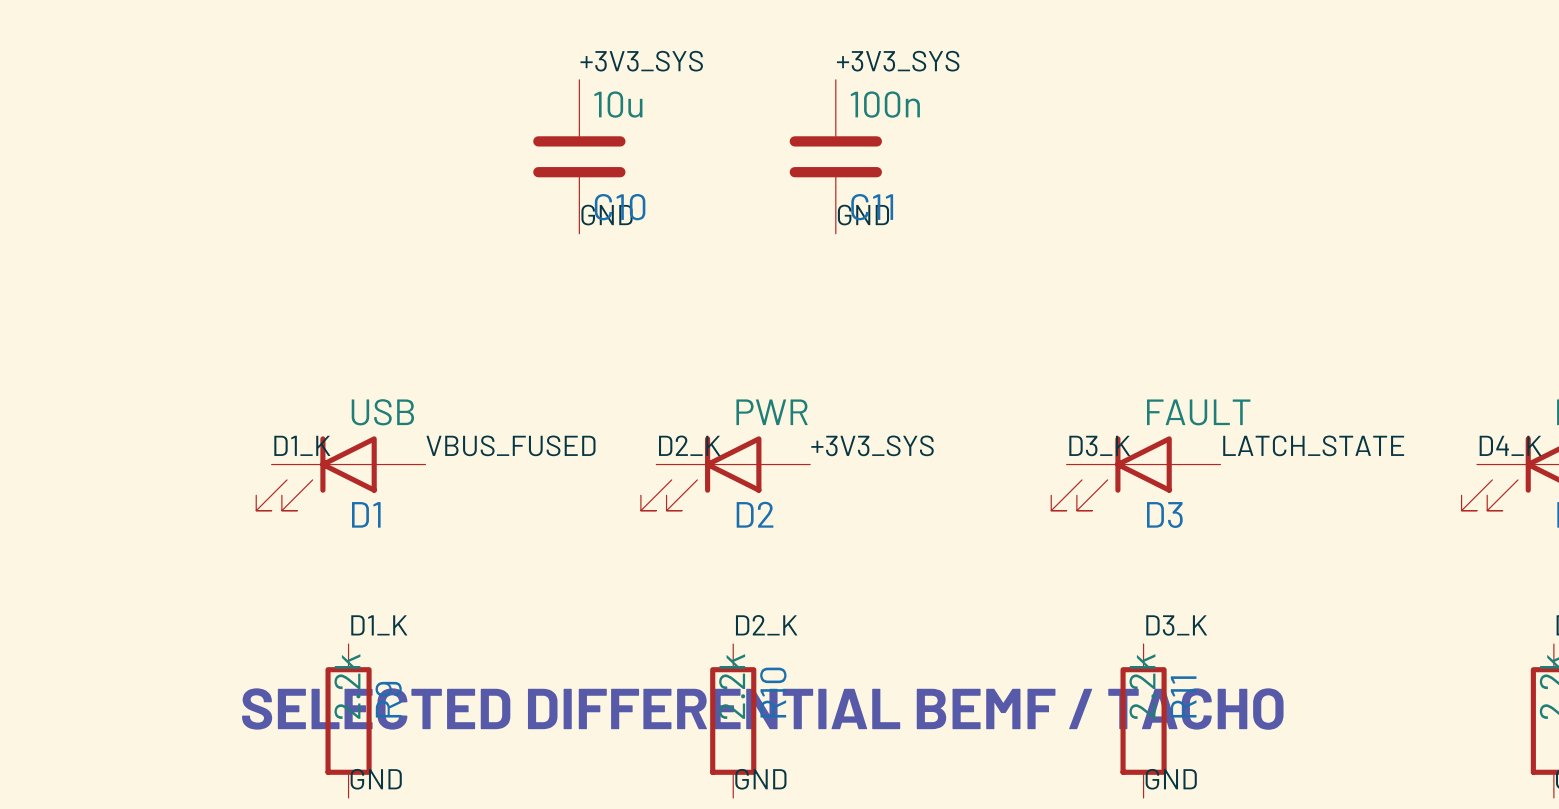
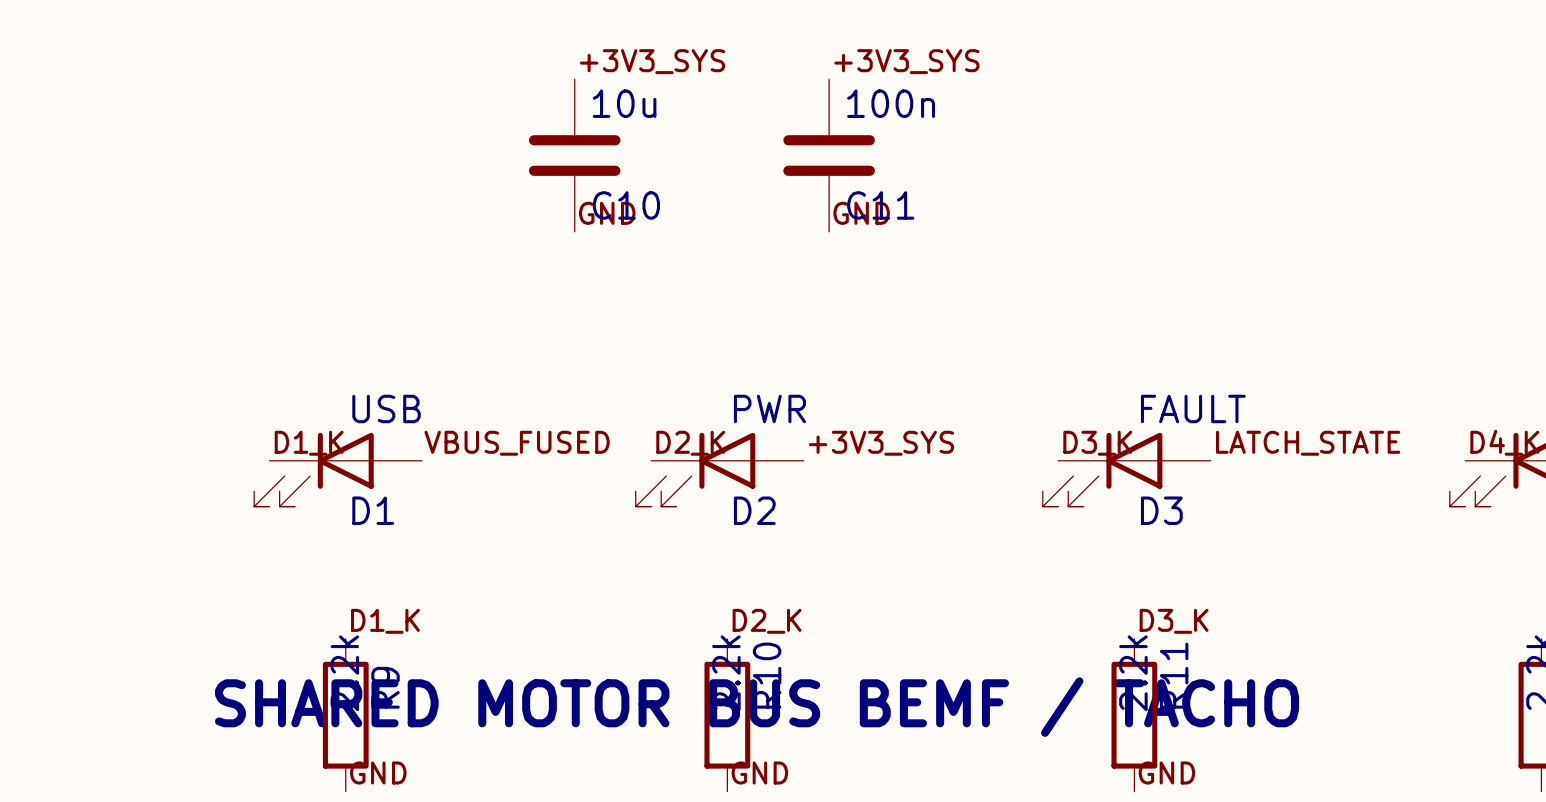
text: SELECTED DIFFERENTIAL BEMF / TACHO (762, 709) -> SHARED MOTOR BUS BEMF / TACHO (757, 707)

